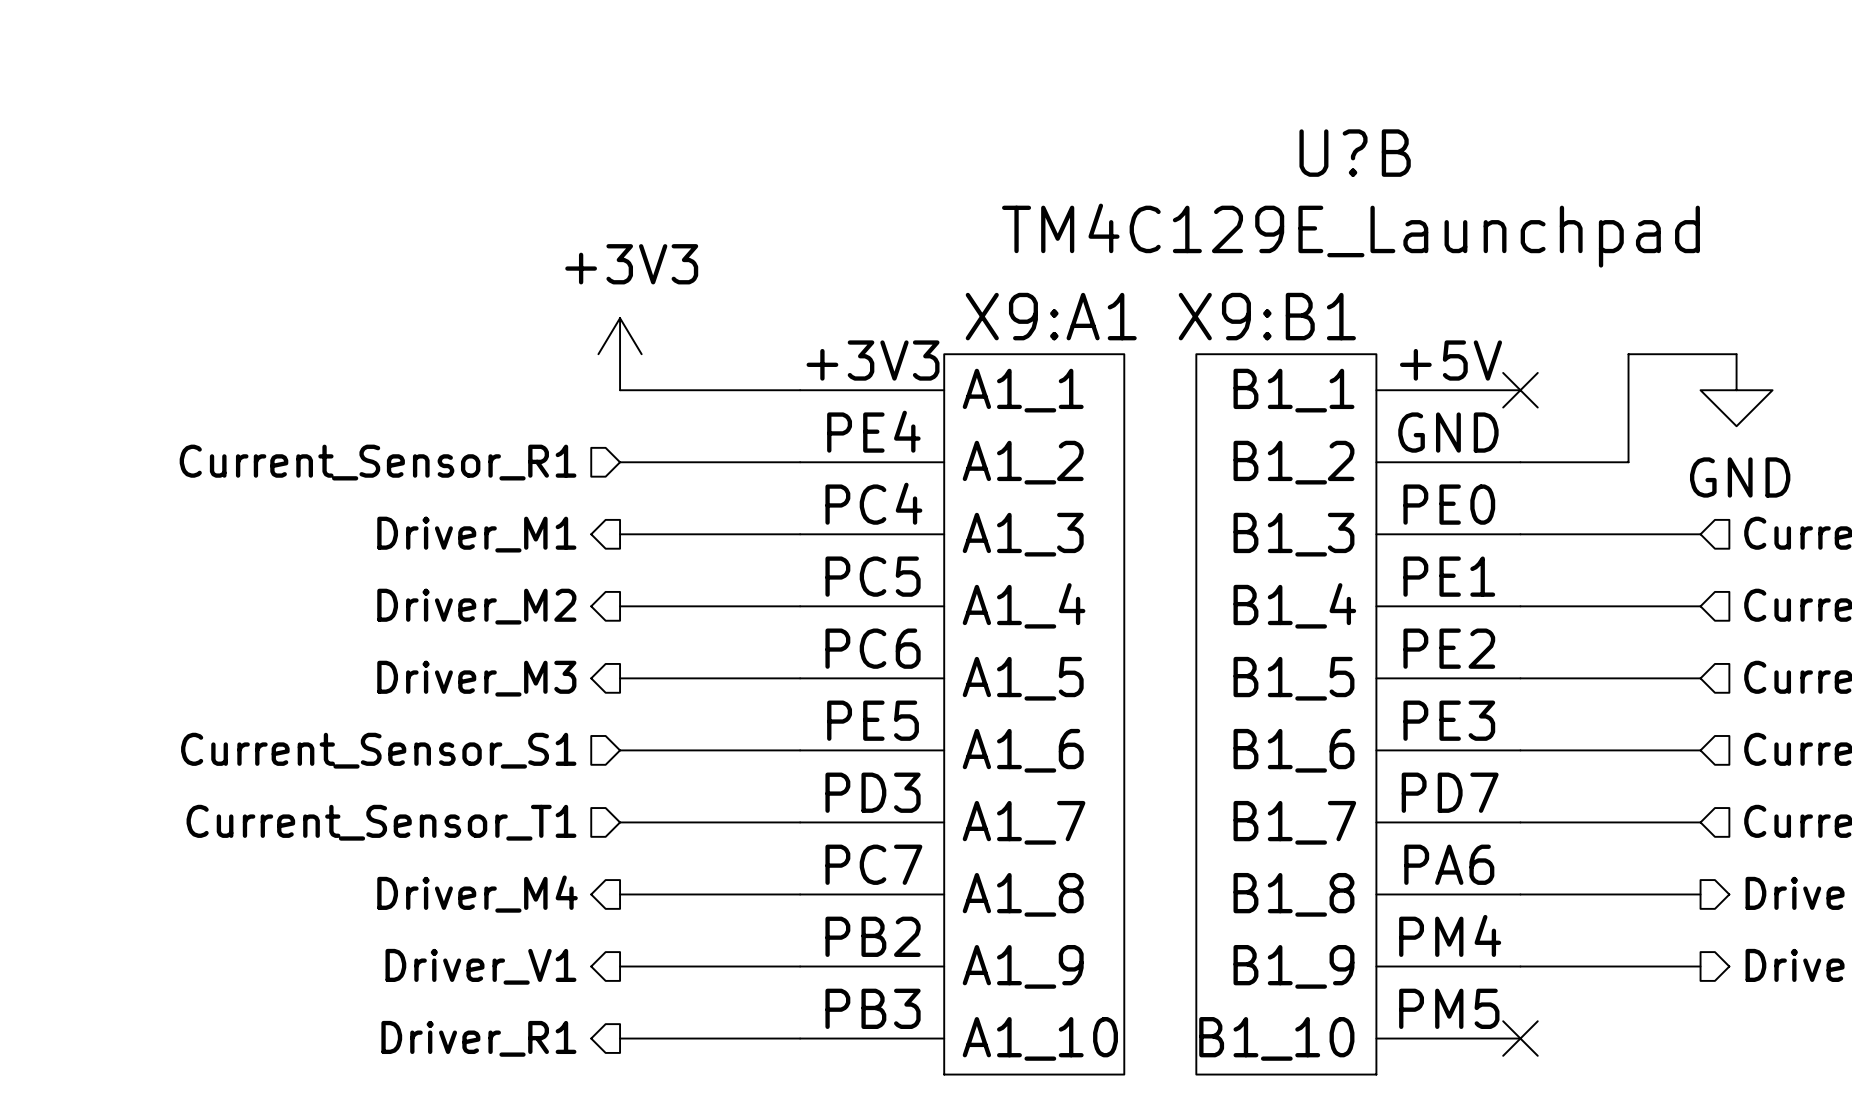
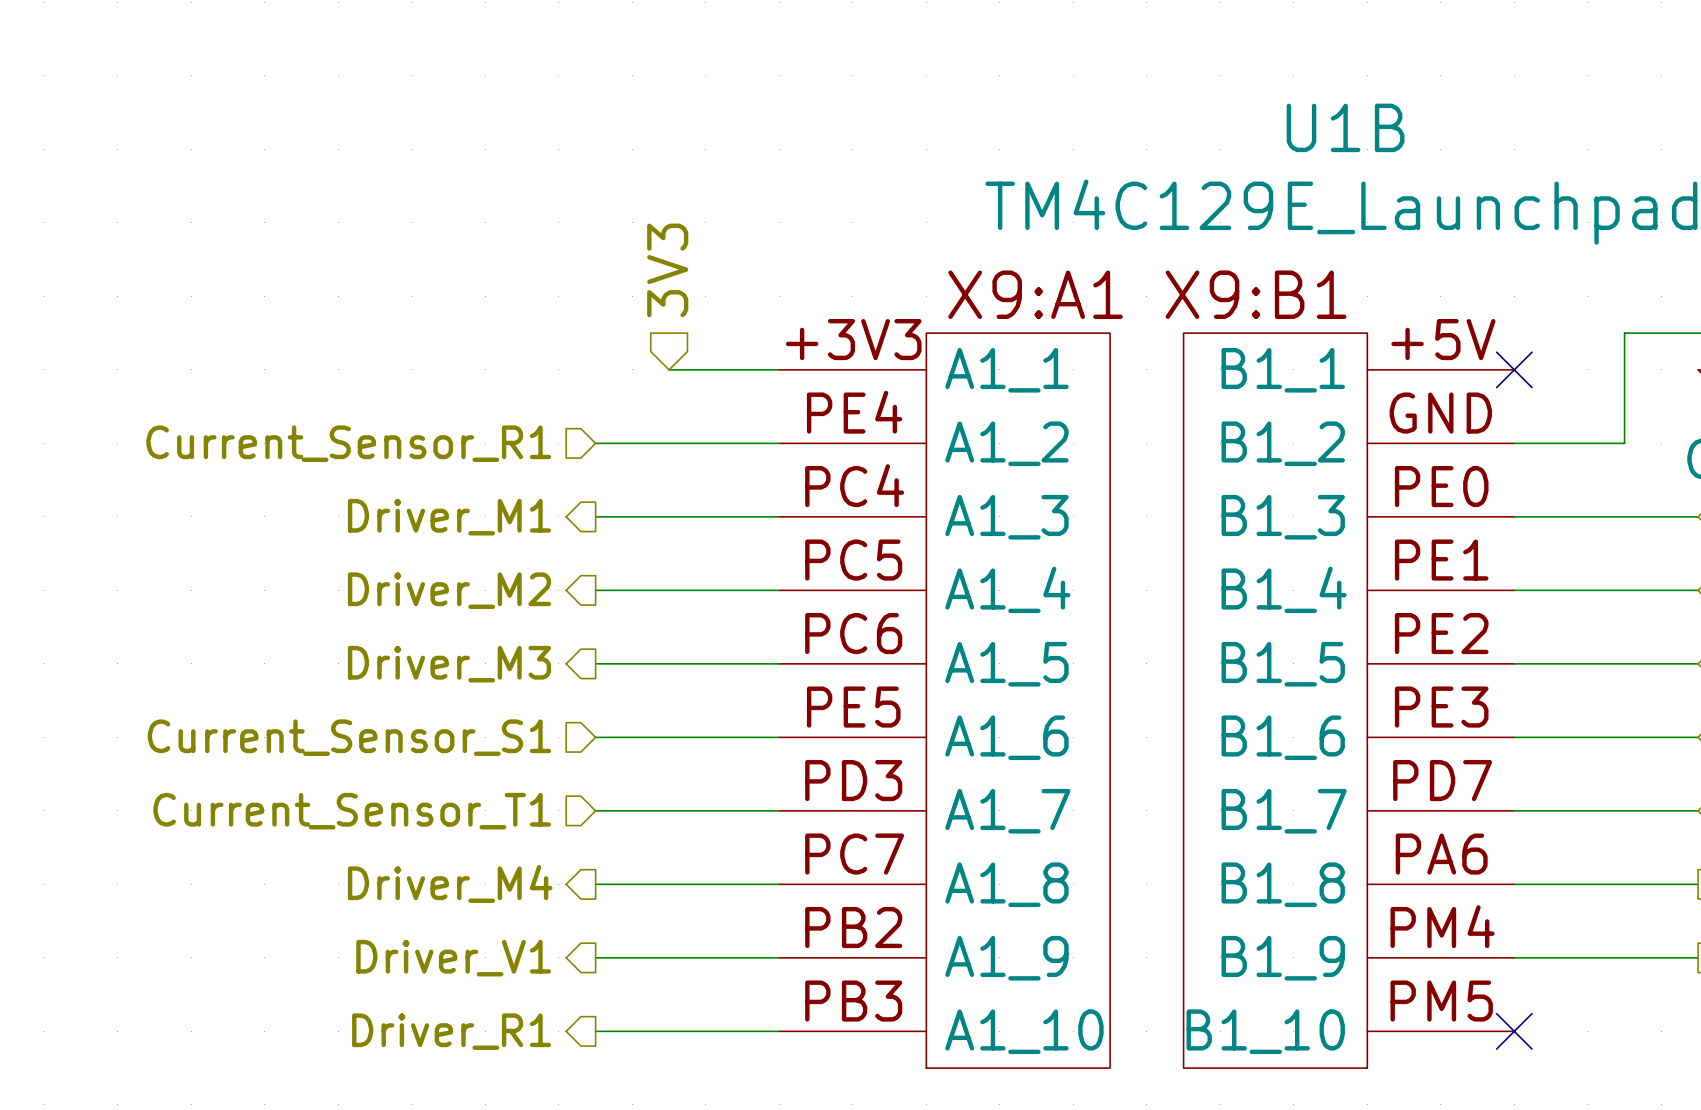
U?B name: U?B (1355, 153) -> U1B (1345, 127)
hierarchical label: none -> 3V3 (667, 270)
power symbol: +3V3 (620, 354) -> none
wire: (620, 390) (692, 390) -> none

